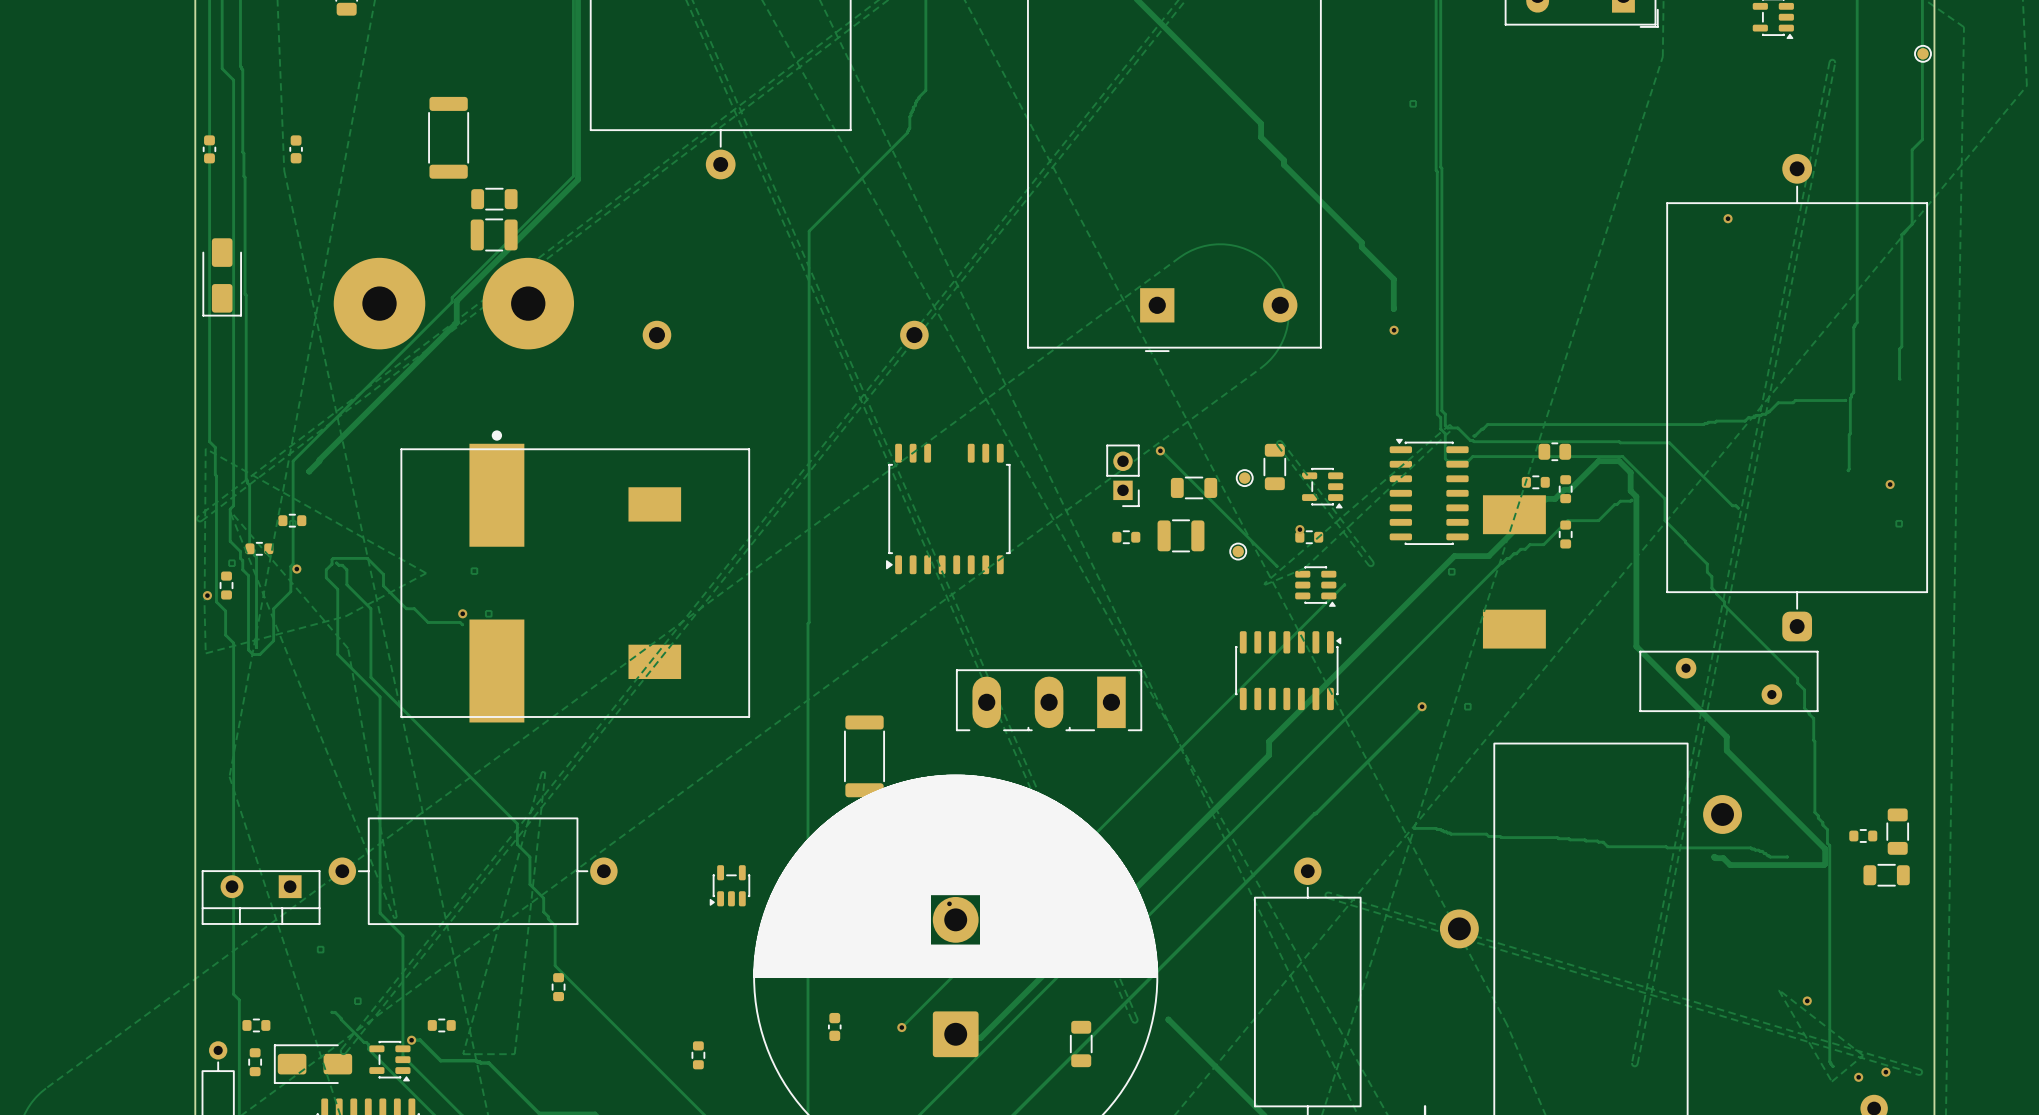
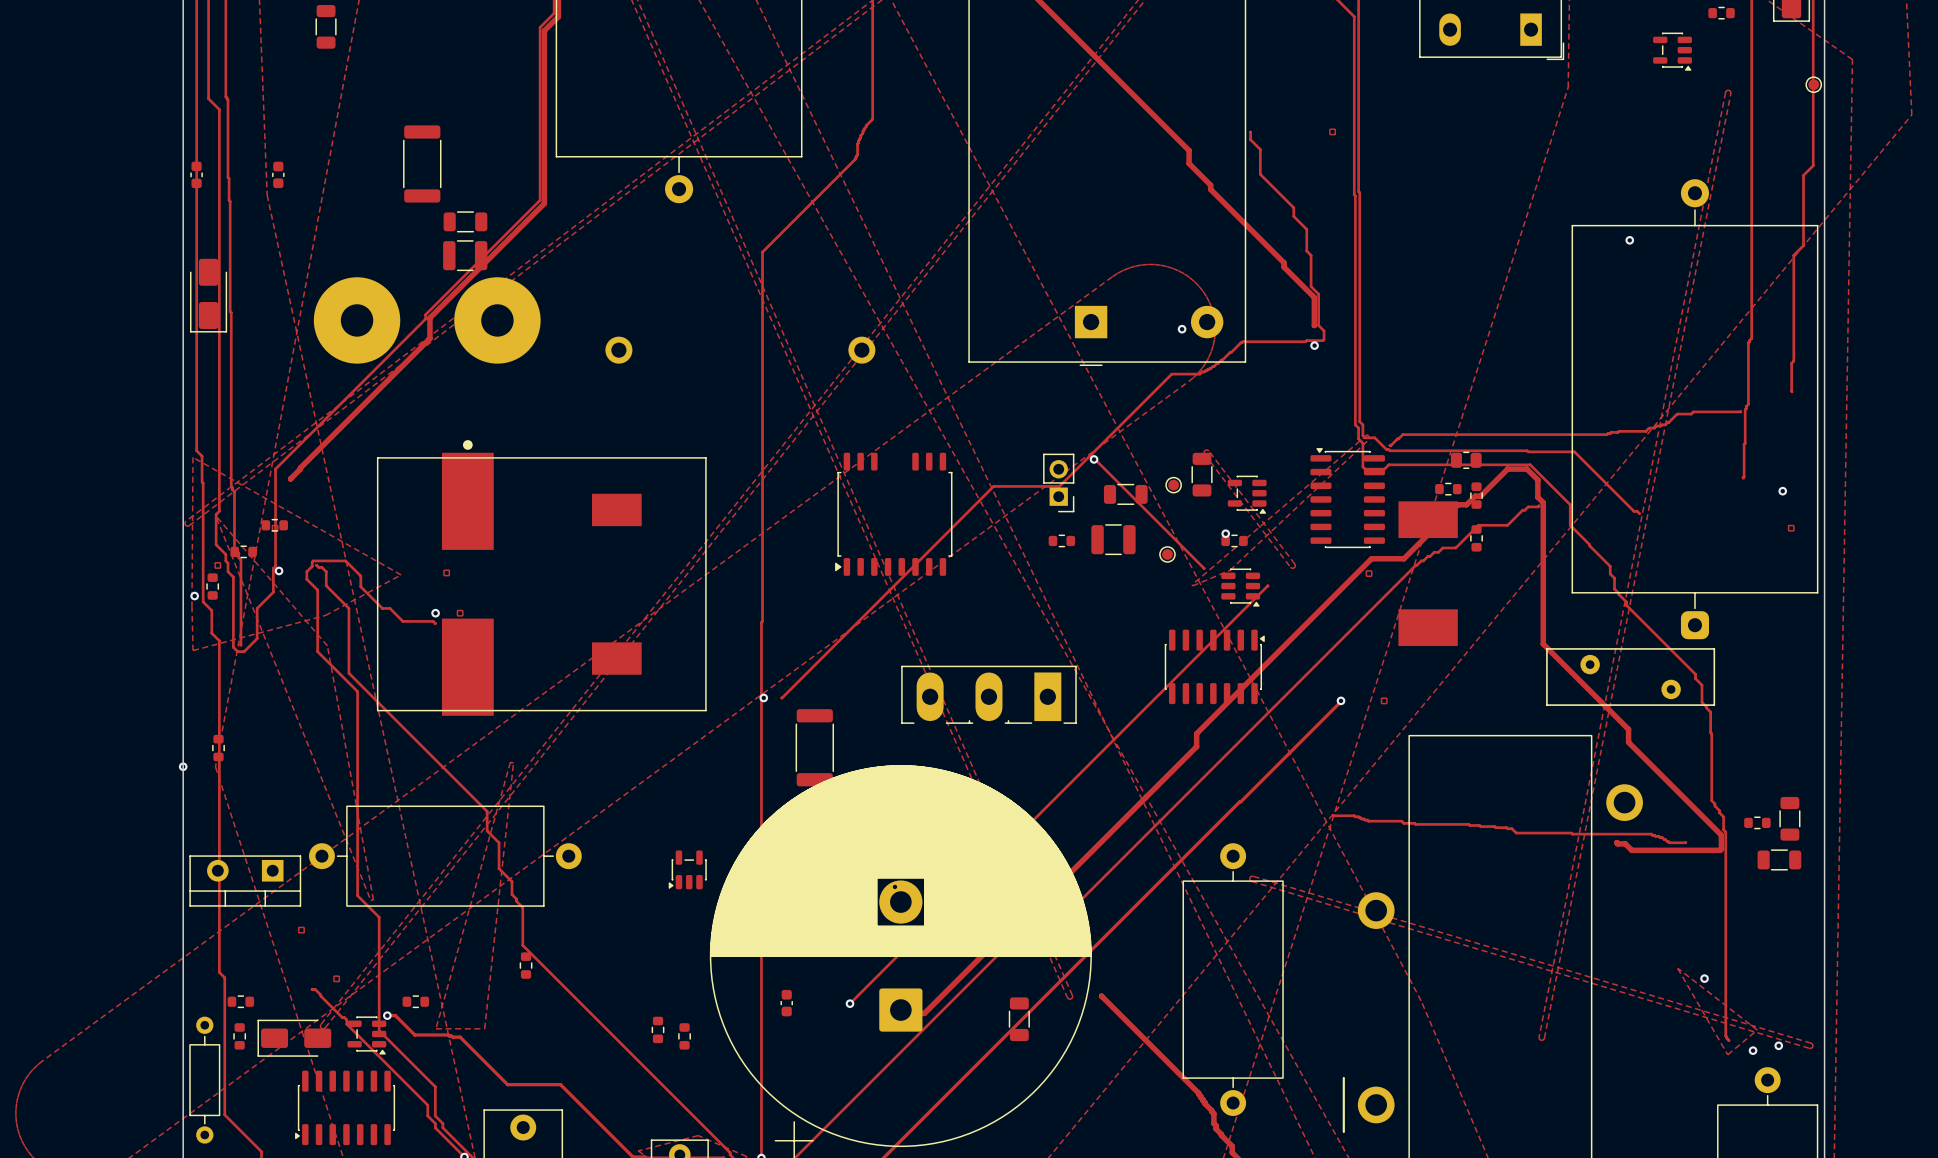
track: none -> (1250, 131) (1250, 139) (1260, 149) (1260, 174) (1293, 207) (1293, 216) (1306, 229) (1306, 251) (1311, 255) (1311, 286) (1318, 294) (1318, 325) (1324, 330) (1324, 339) (1305, 341) (1243, 341) (1222, 360) (1199, 374) (1171, 374) (1059, 486) (993, 486) (781, 697)
via: none -> (1182, 329)
via: none -> (763, 697)
part: none -> (218, 748)
via: none -> (183, 766)
part: none -> (684, 1036)

